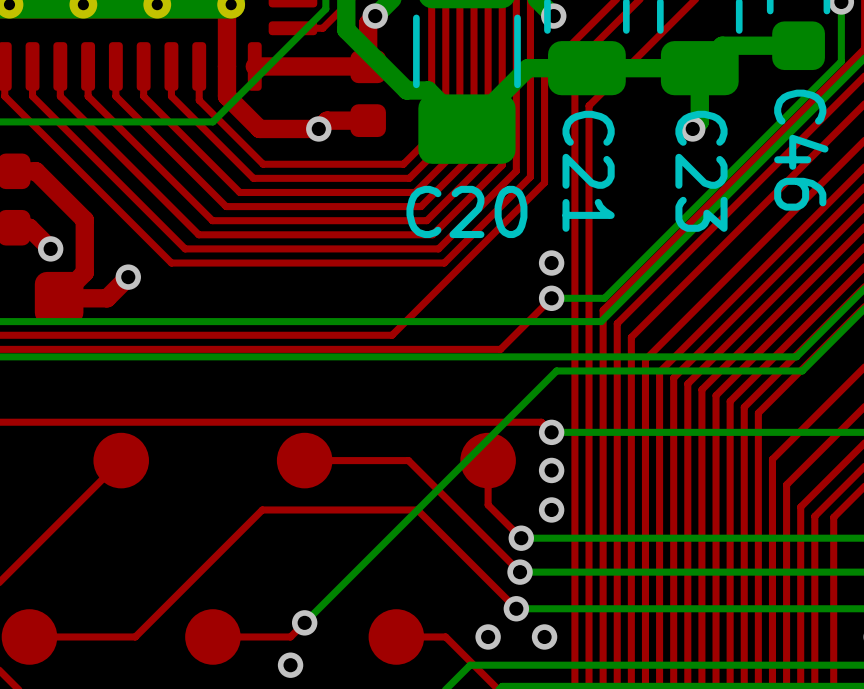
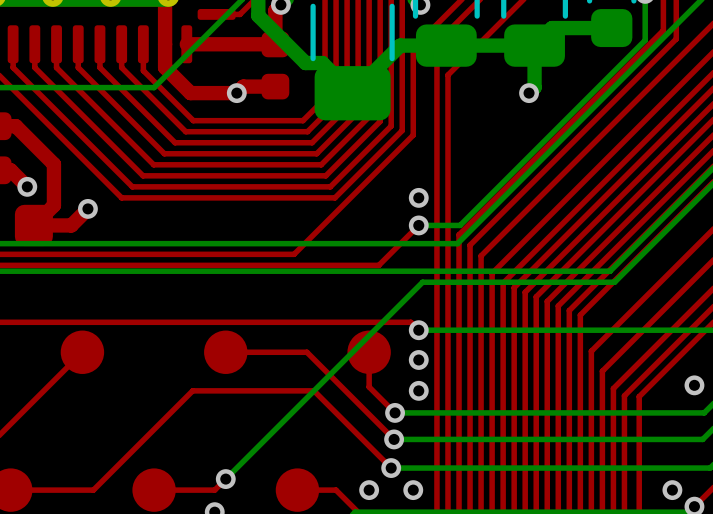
C46 name: C46 (801, 150) -> none
C21 name: C21 (588, 171) -> none
C23 name: C23 (701, 171) -> none
C20 name: C20 (466, 211) -> none

